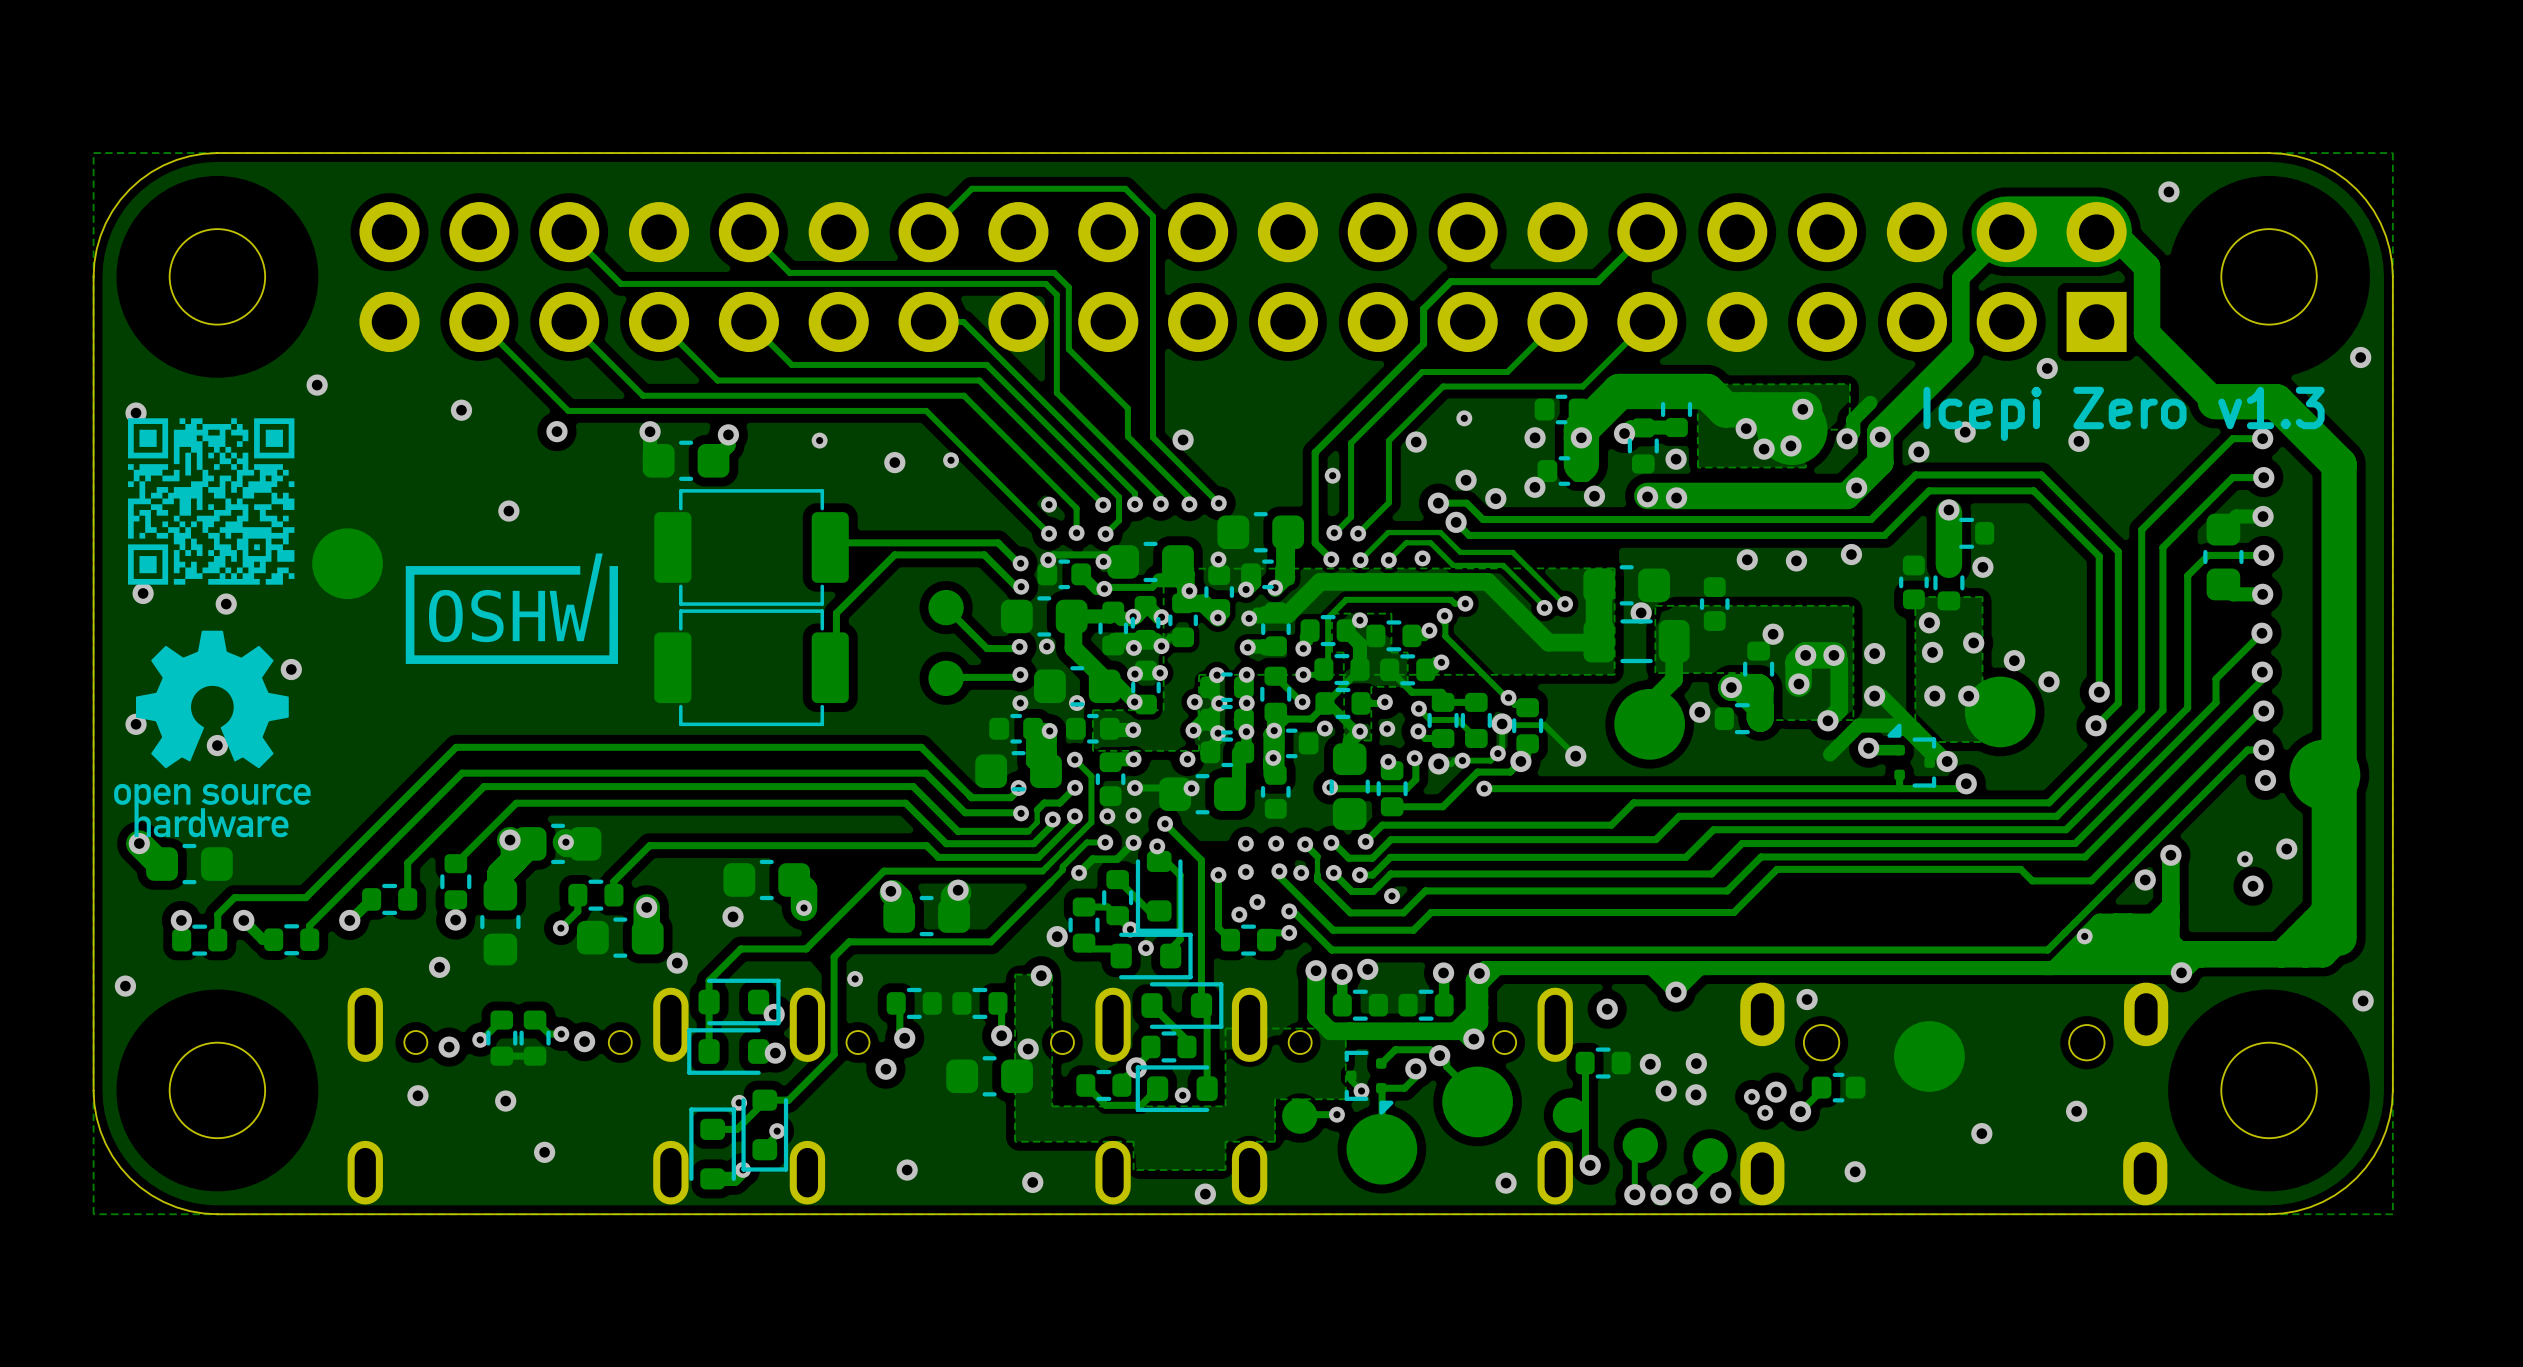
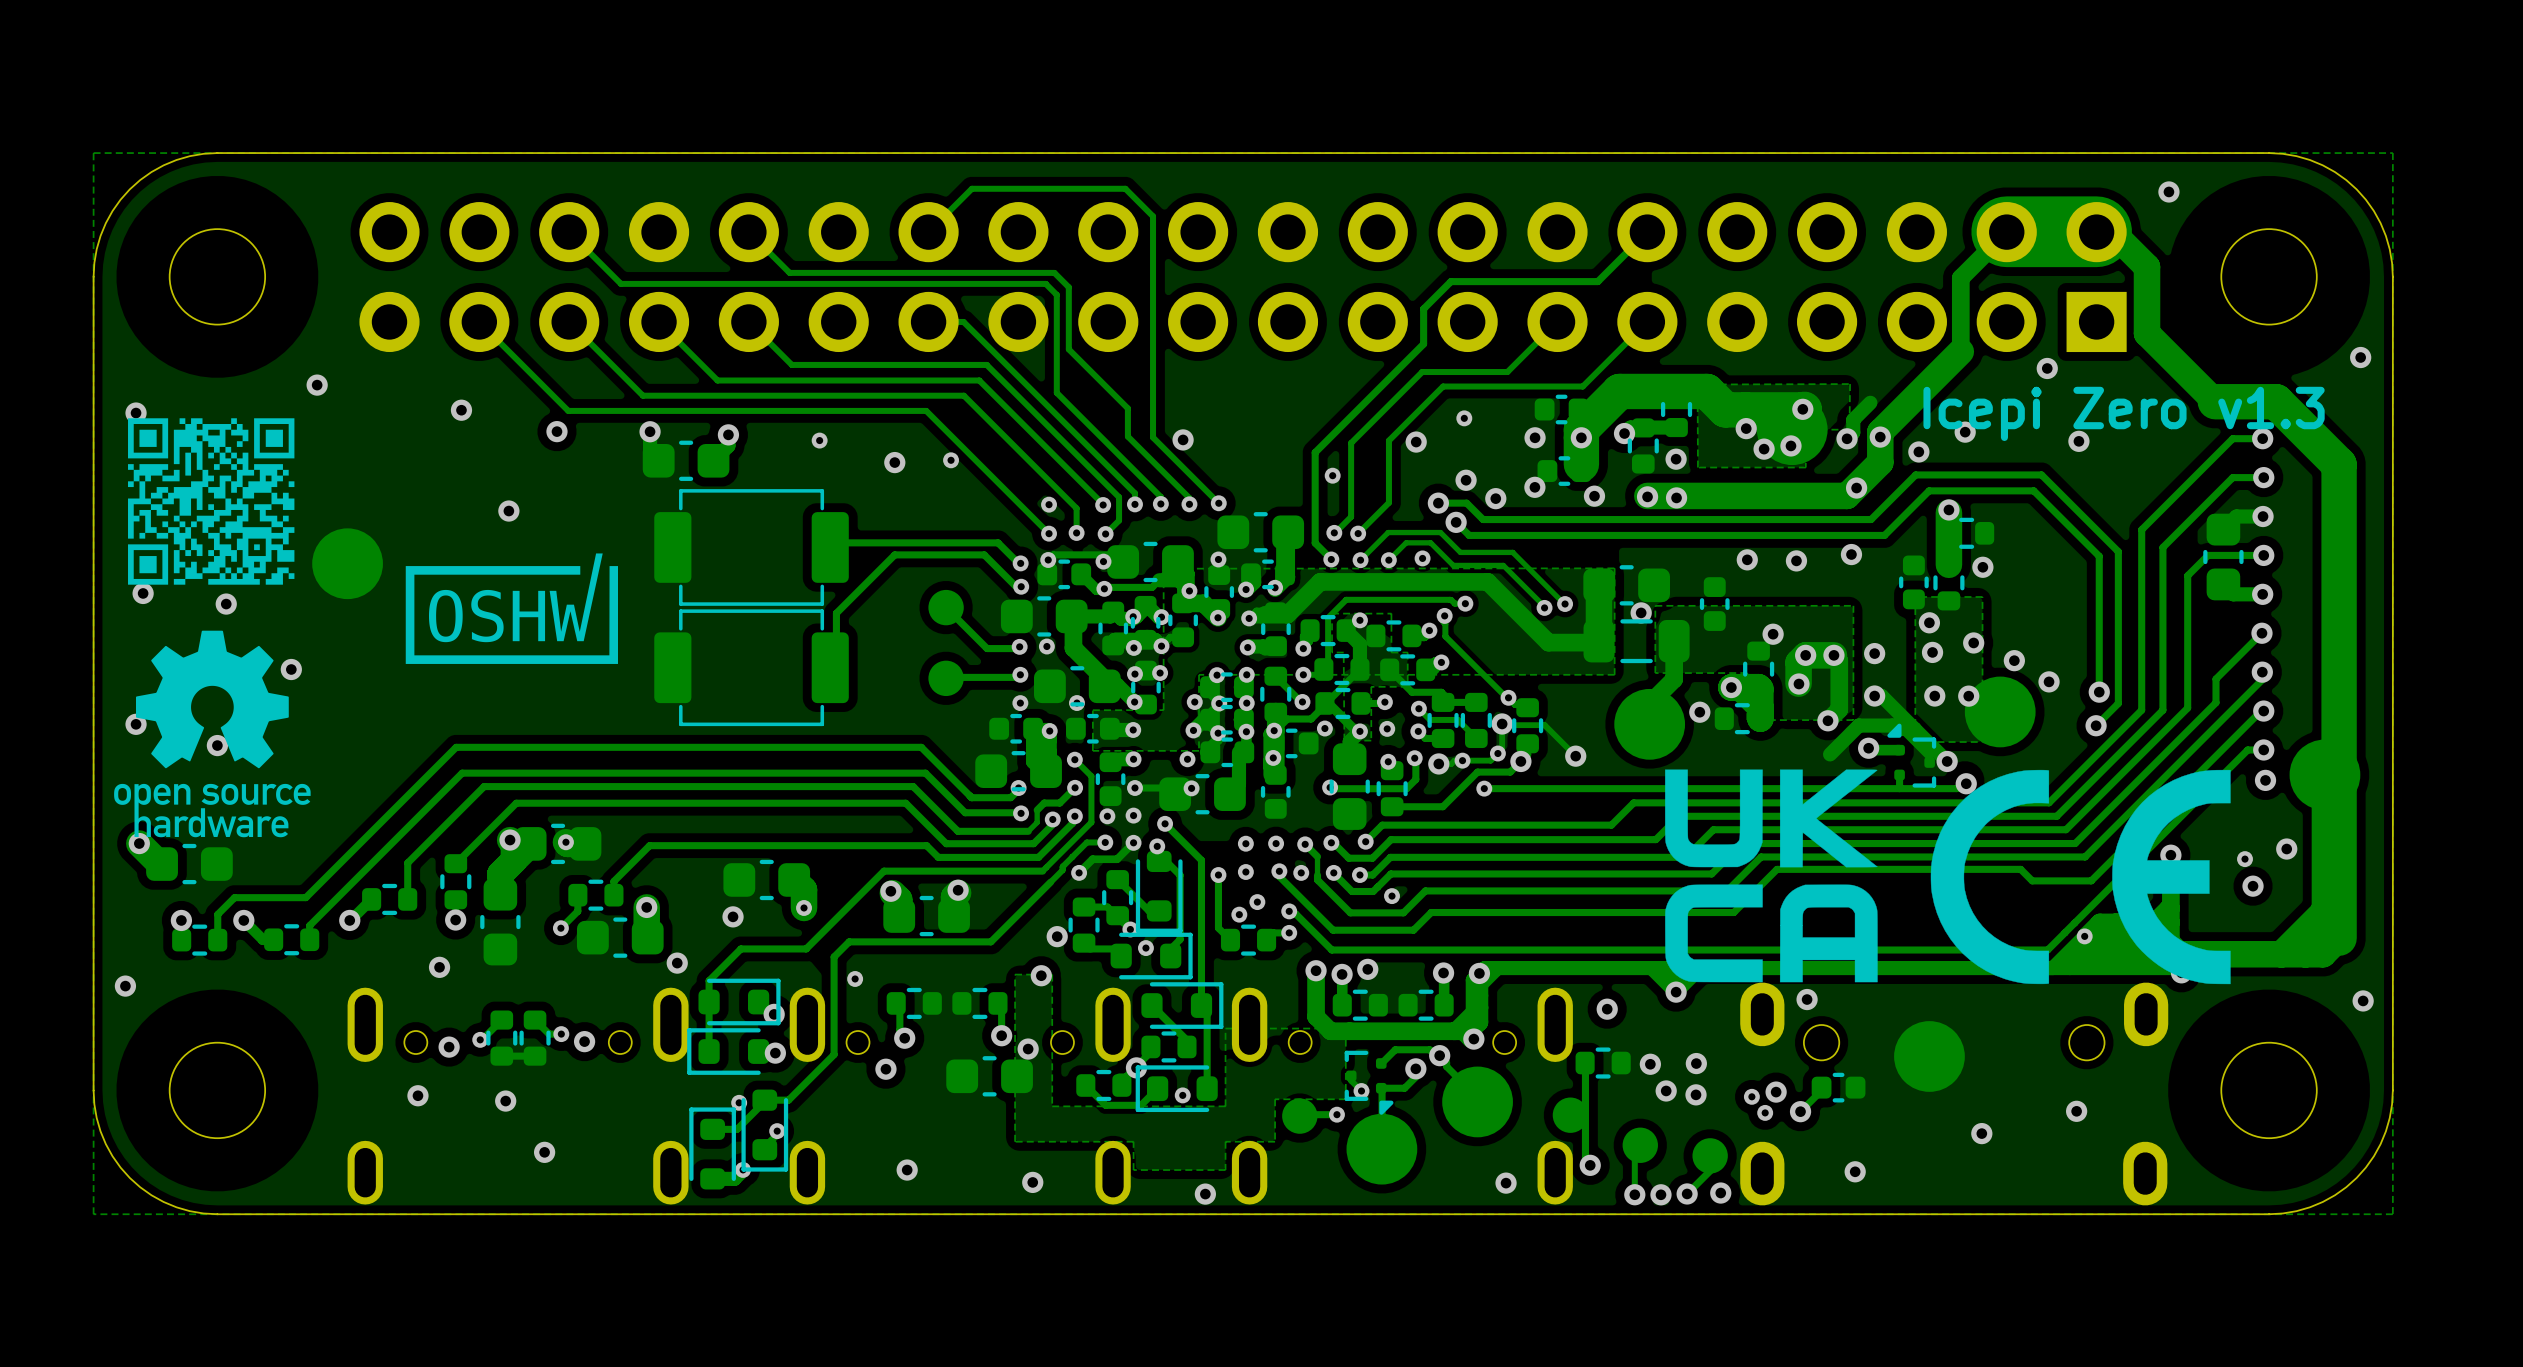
drawing: none -> [1665, 769, 1878, 983]
drawing: none -> [1930, 769, 2231, 985]

